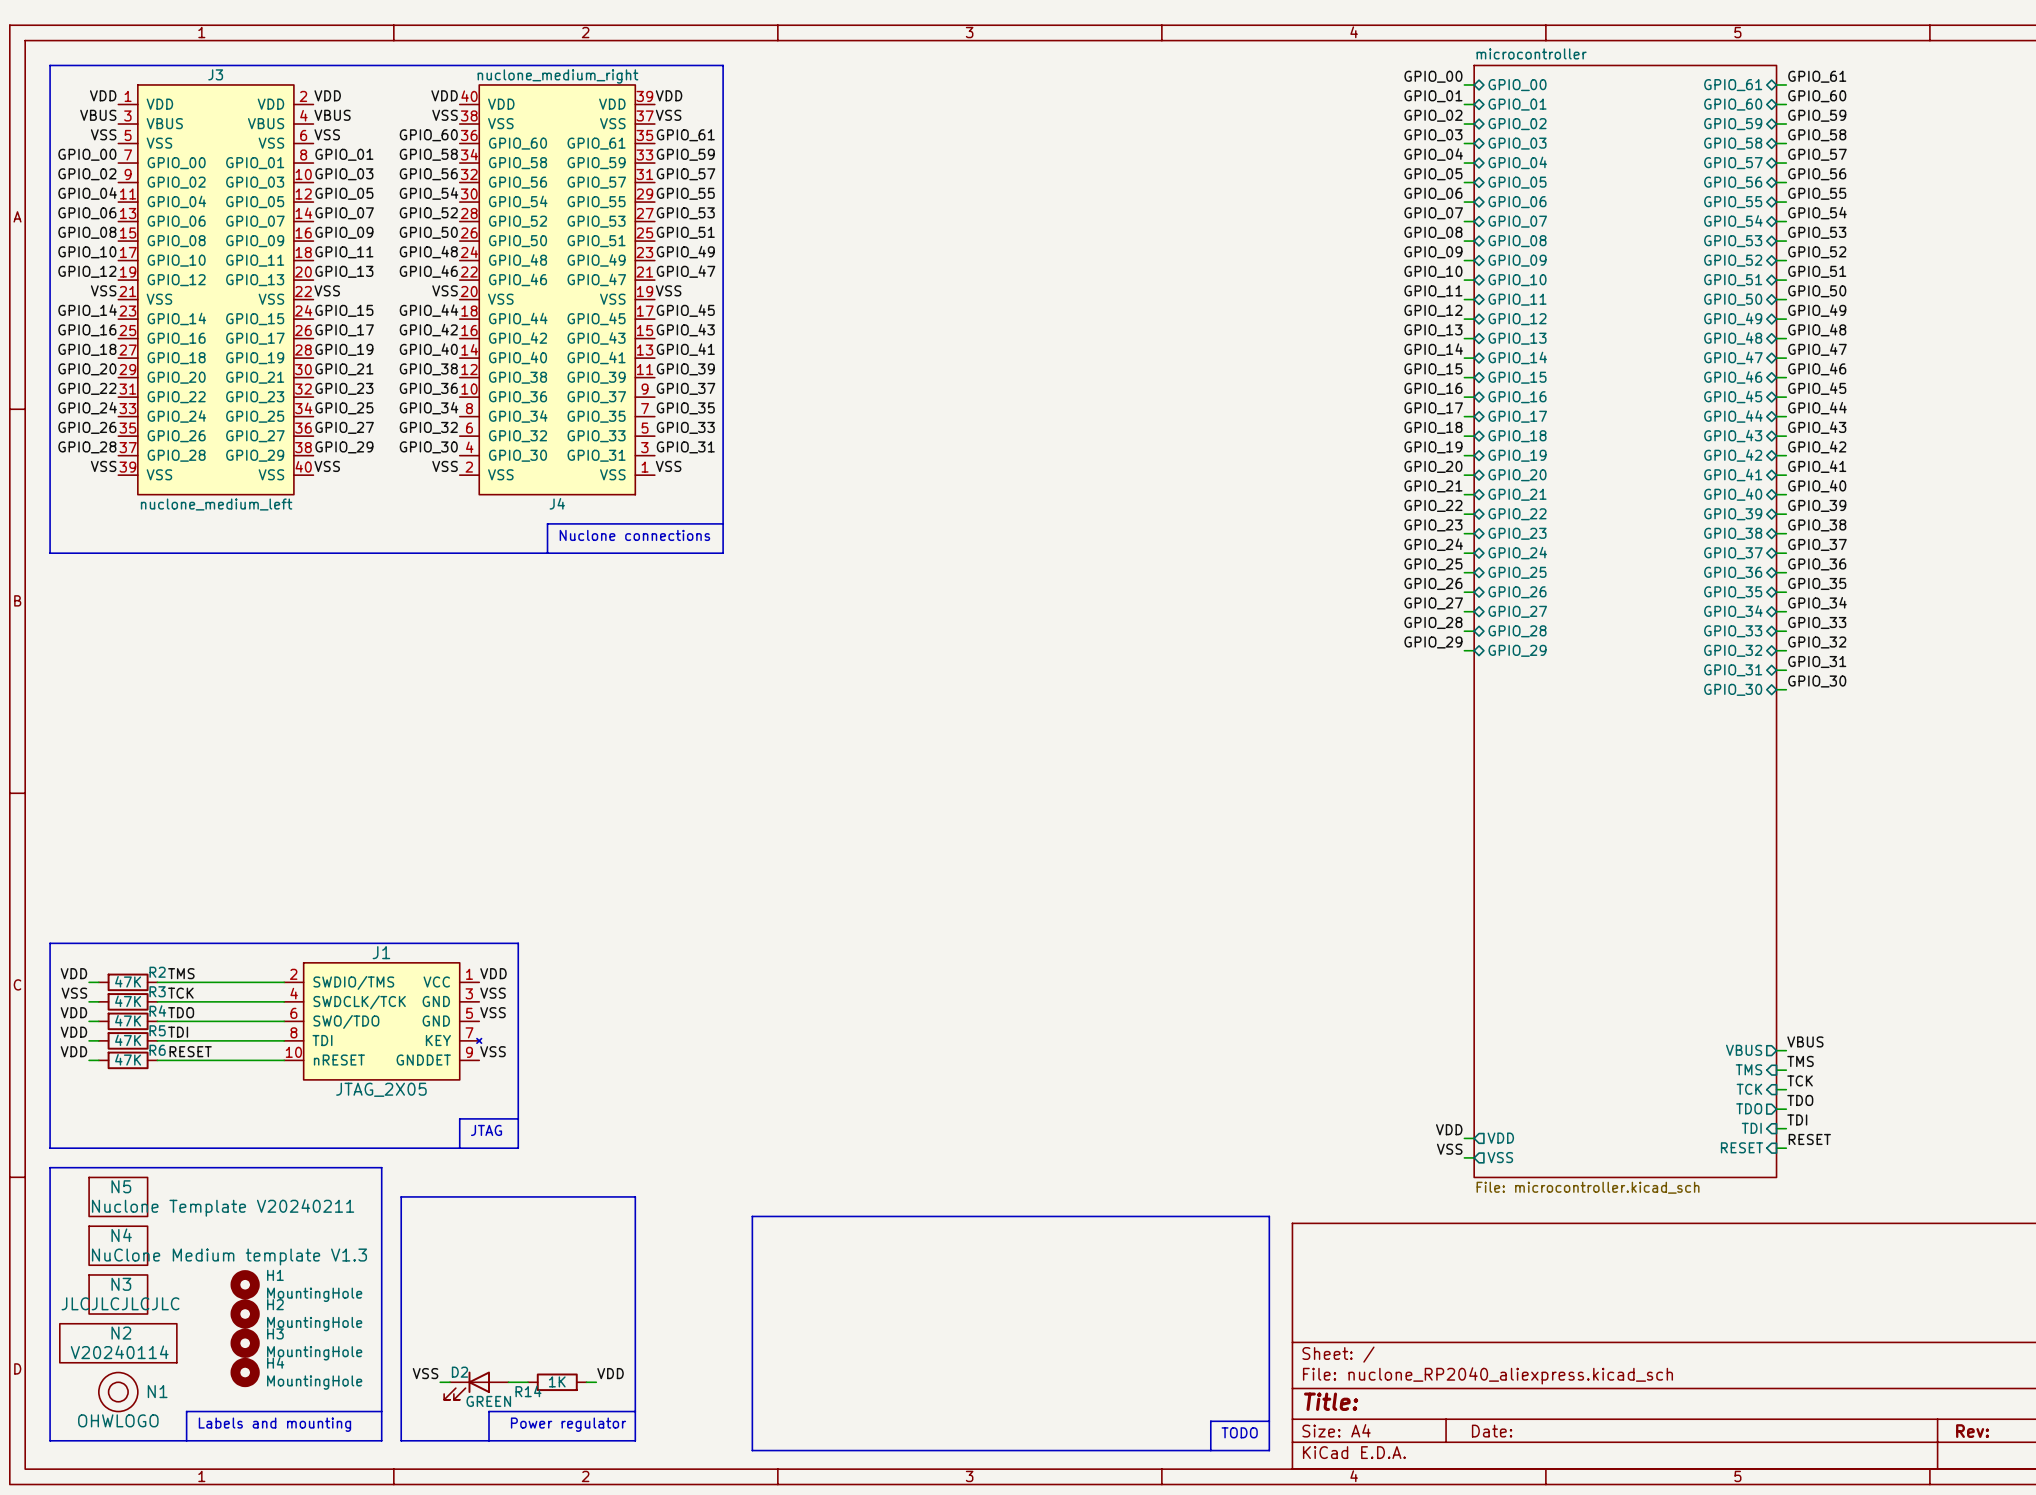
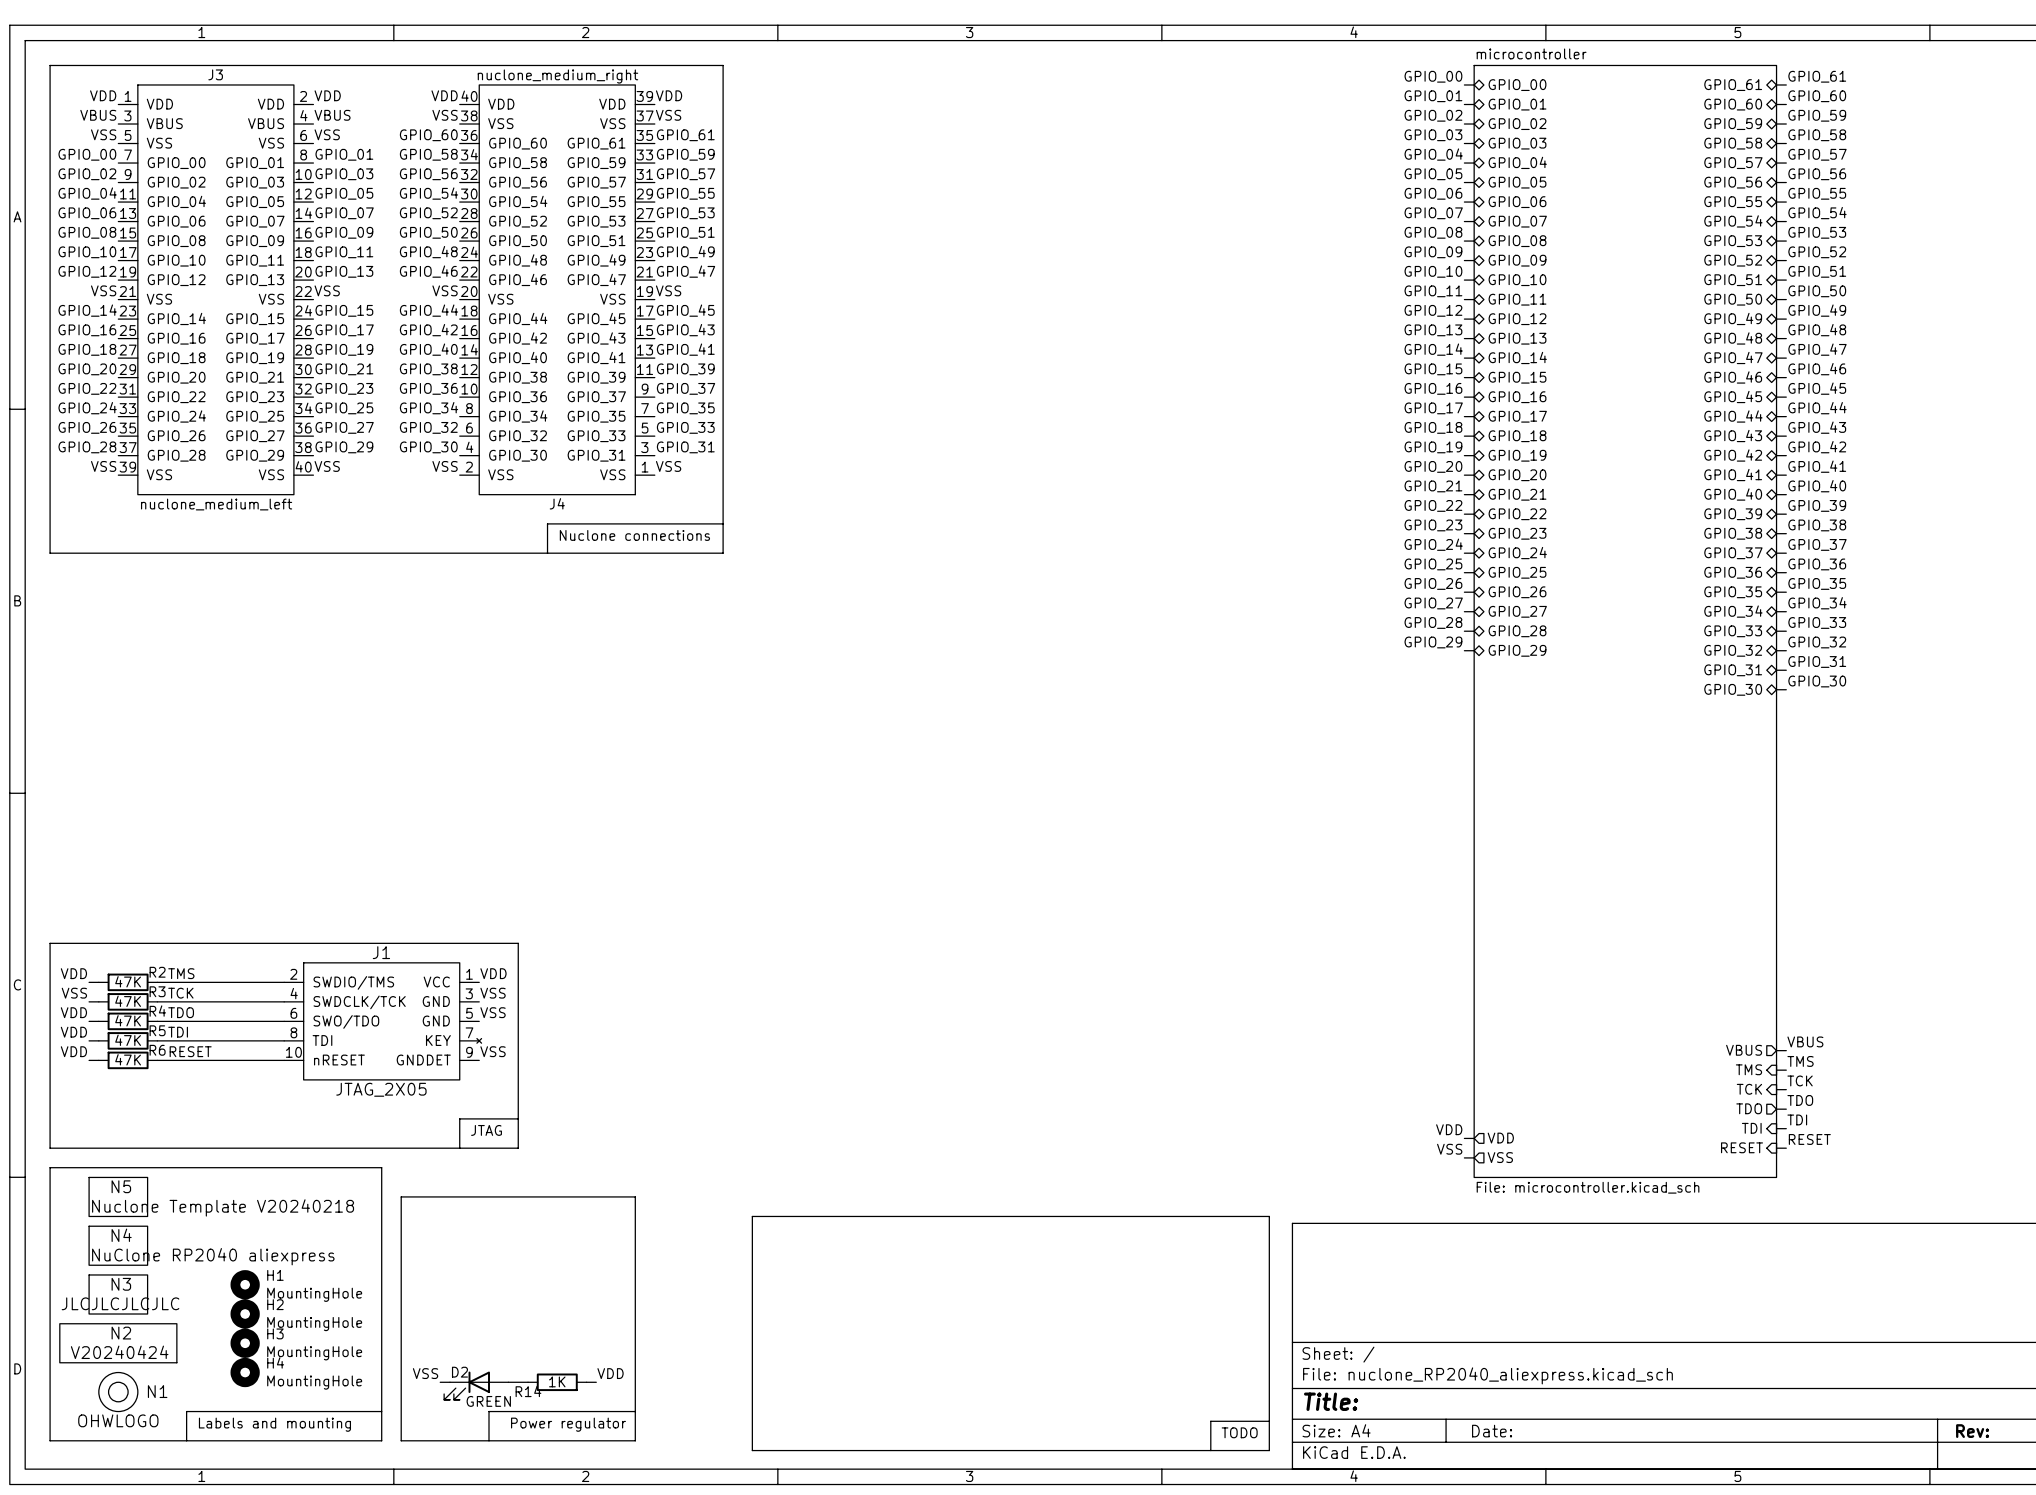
N5 value: Nuclone Template V20240211 (223, 1207) -> Nuclone Template V20240218 (223, 1207)
N4 value: NuClone Medium template V1.3 (229, 1256) -> NuClone RP2040 aliexpress (213, 1256)
N2 value: V20240114 (119, 1352) -> V20240424 (119, 1352)

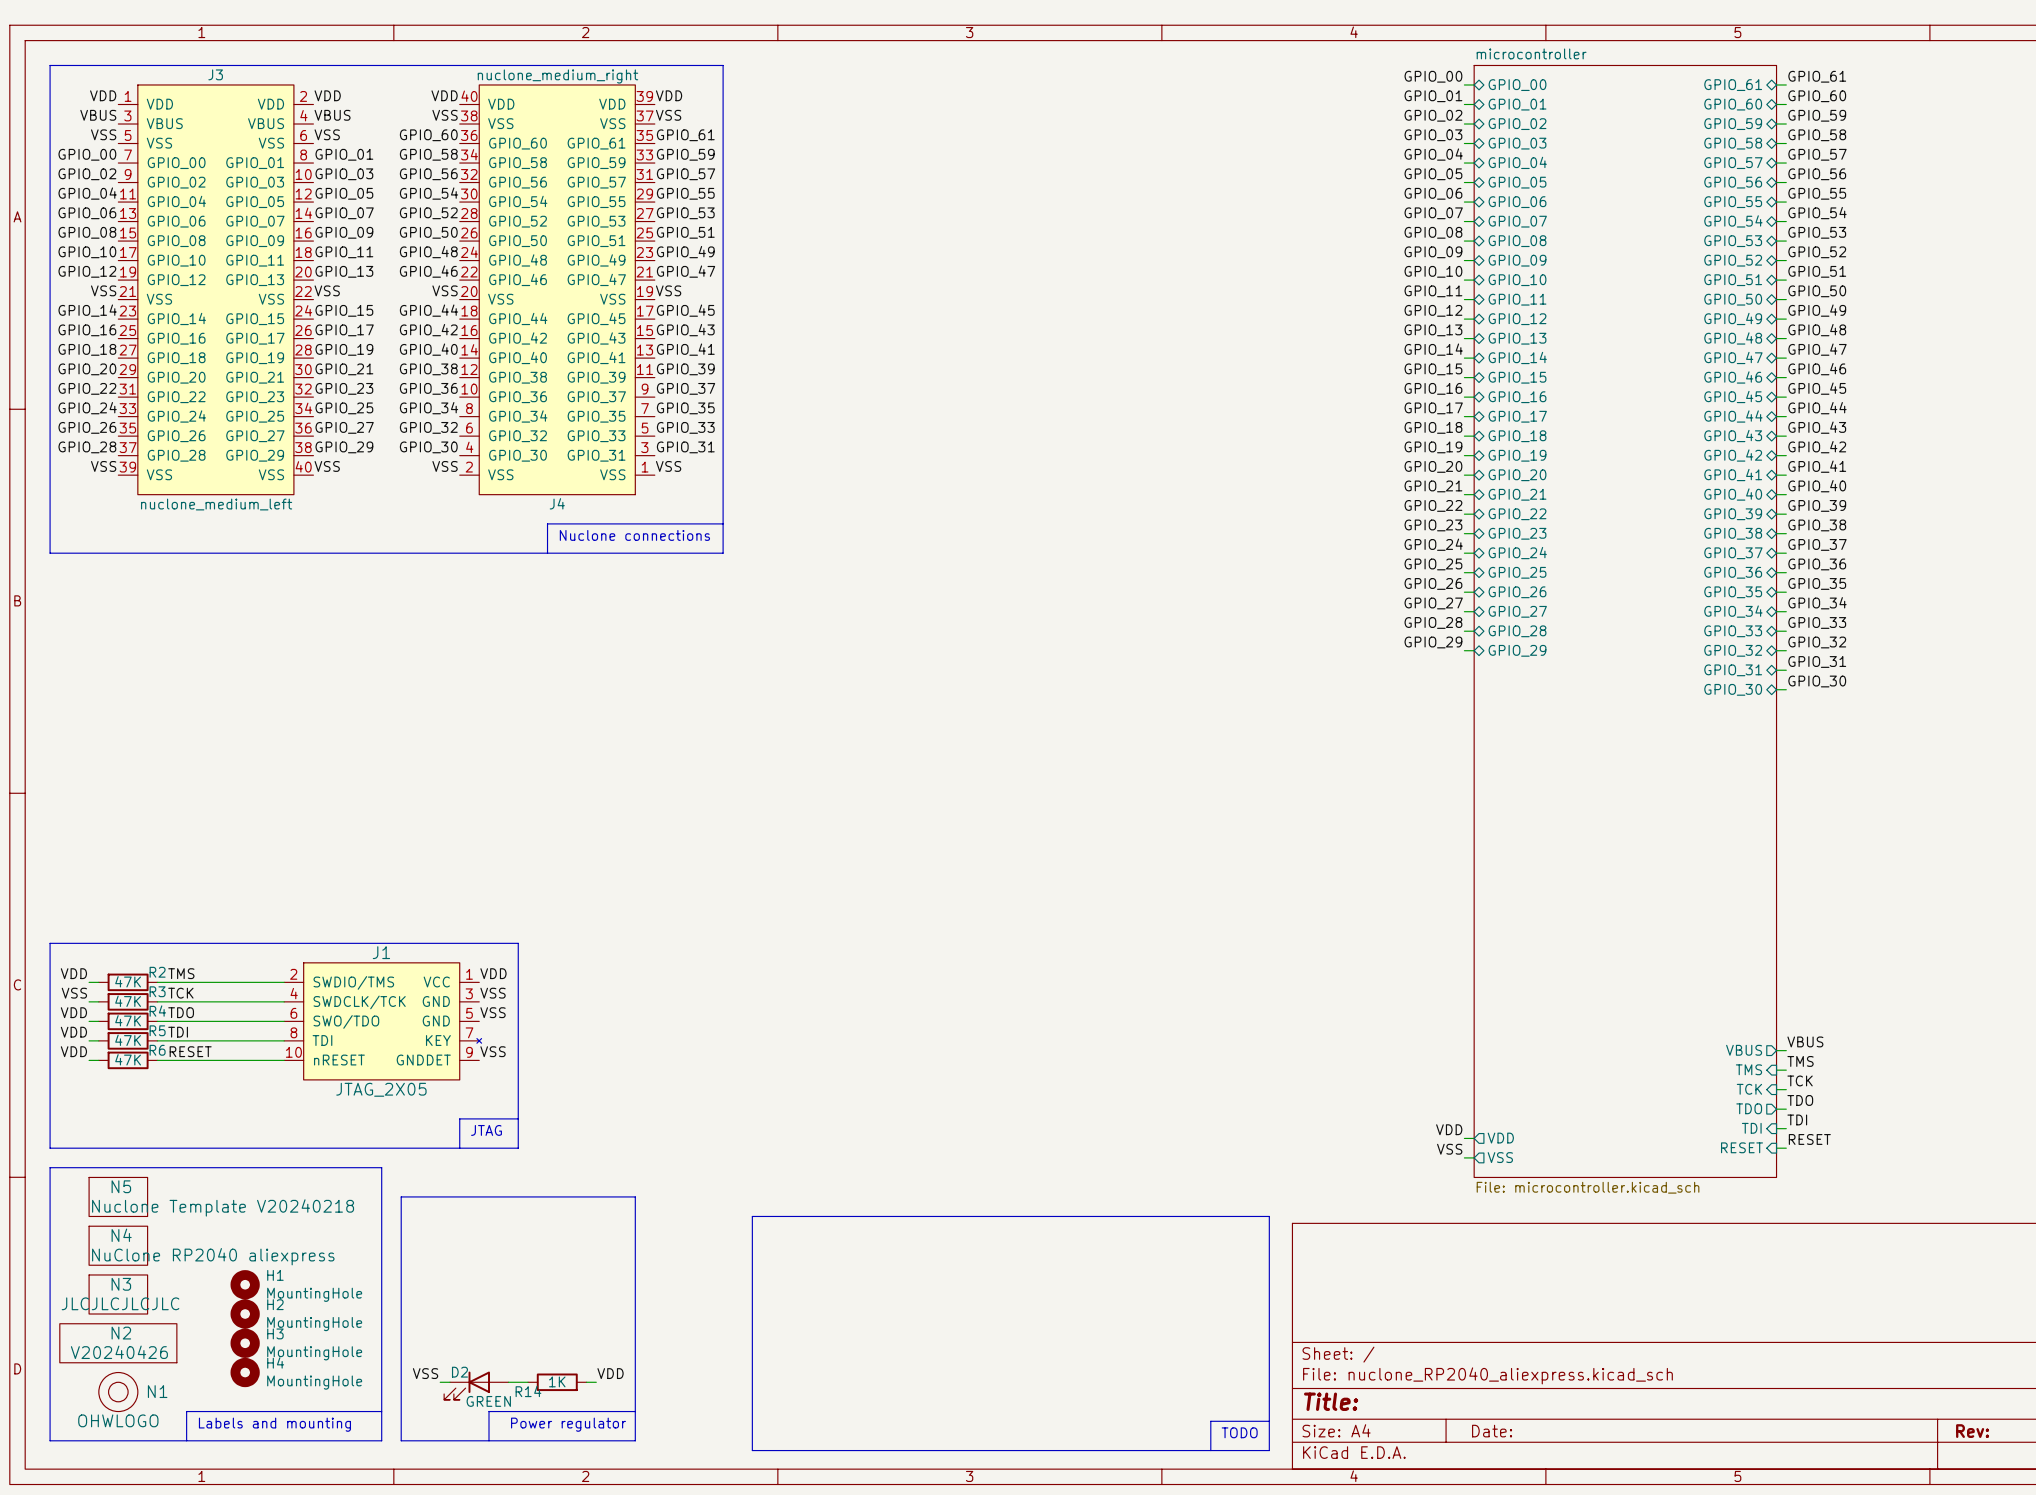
N2 value: V20240424 (119, 1352) -> V20240426 (119, 1352)

